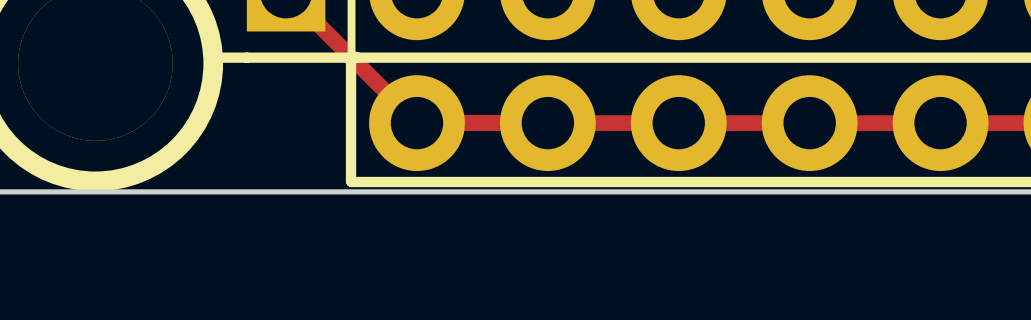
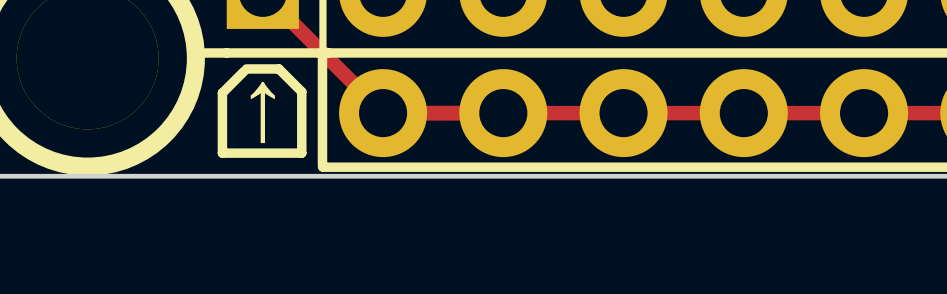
line: none -> (246, 68) (278, 68) (301, 91) (301, 153) (222, 153) (222, 93) (244, 71)
text: none -> ↑ (262, 112)

